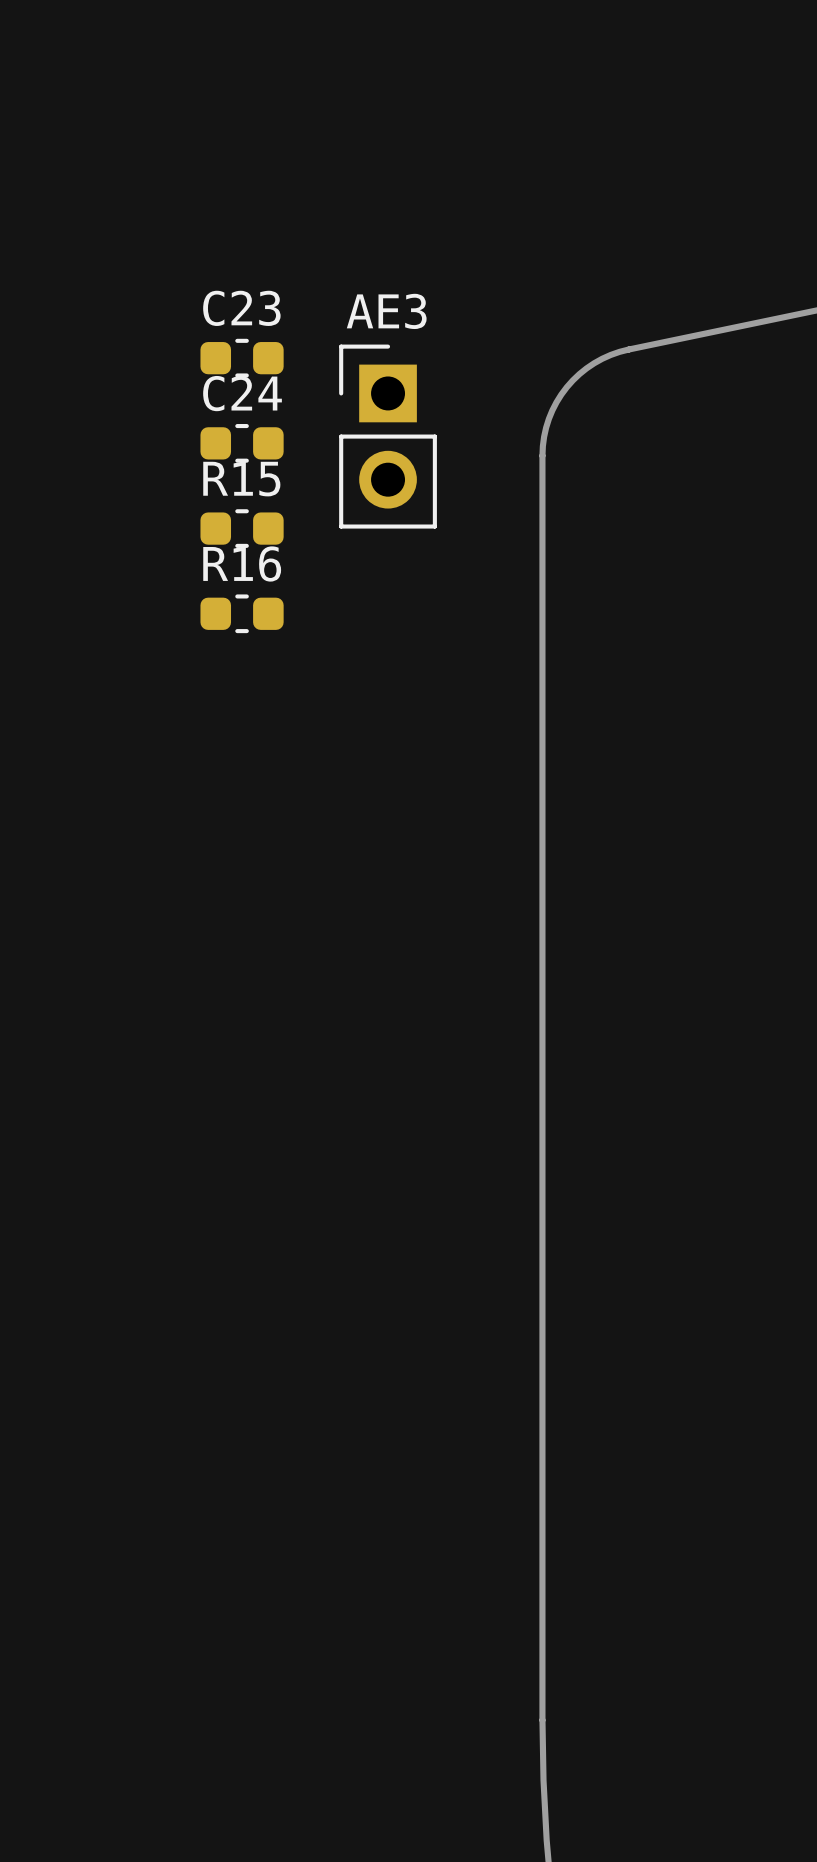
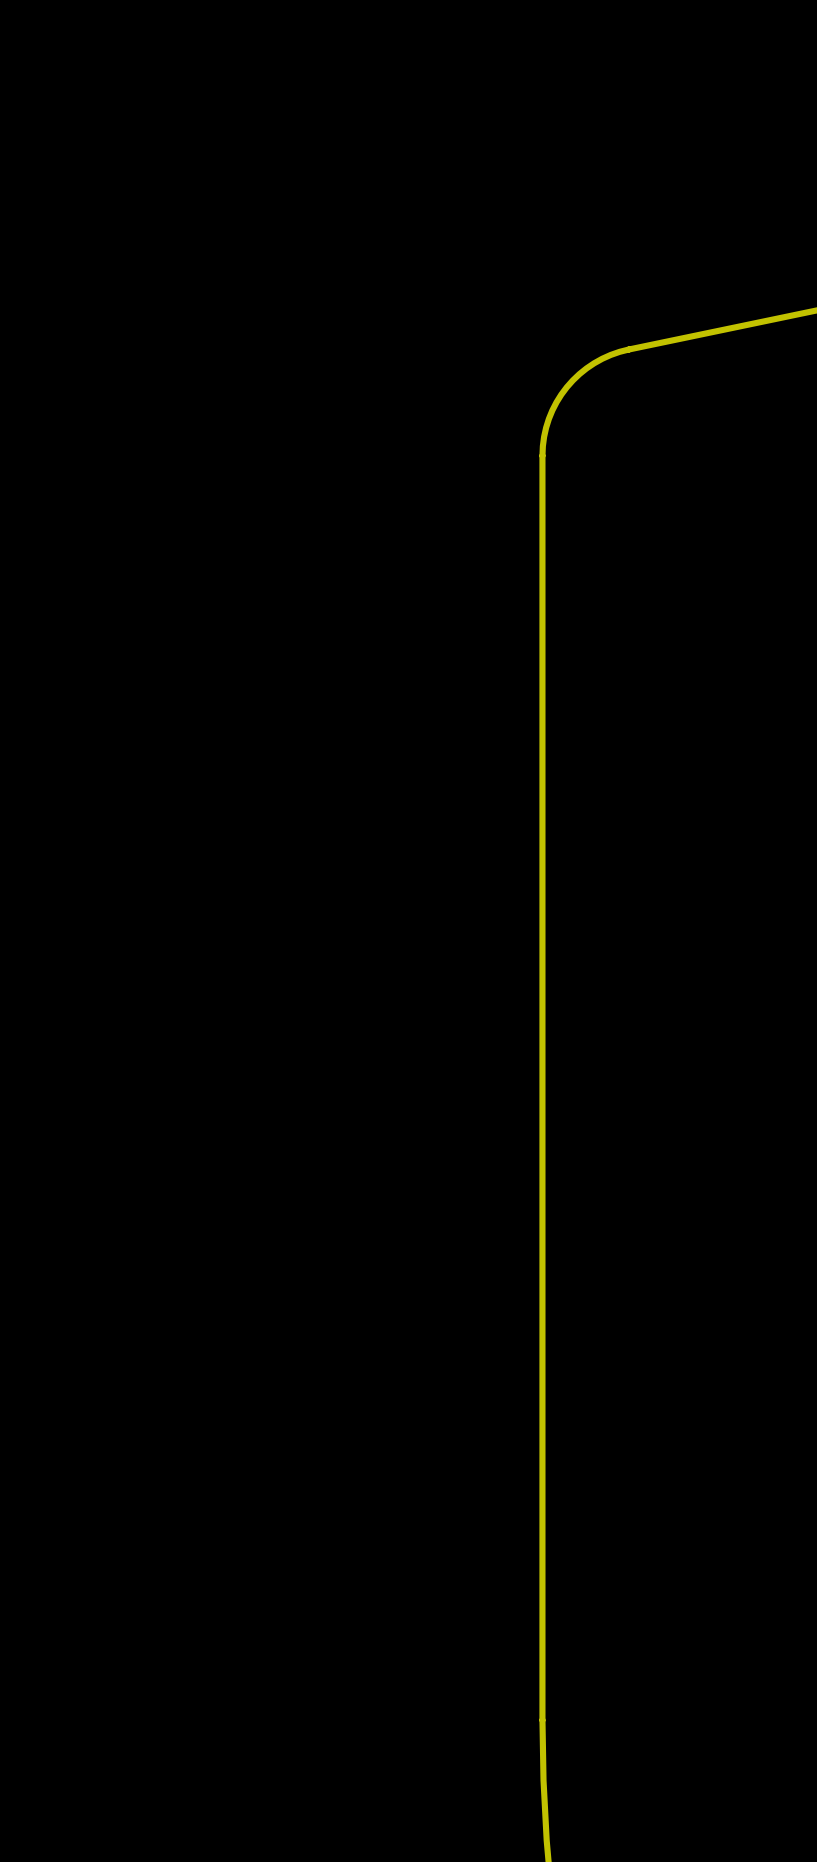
C23: (242, 358) -> none
AE3: (388, 436) -> none
C24: (242, 443) -> none
R15: (242, 528) -> none
R16: (242, 613) -> none

